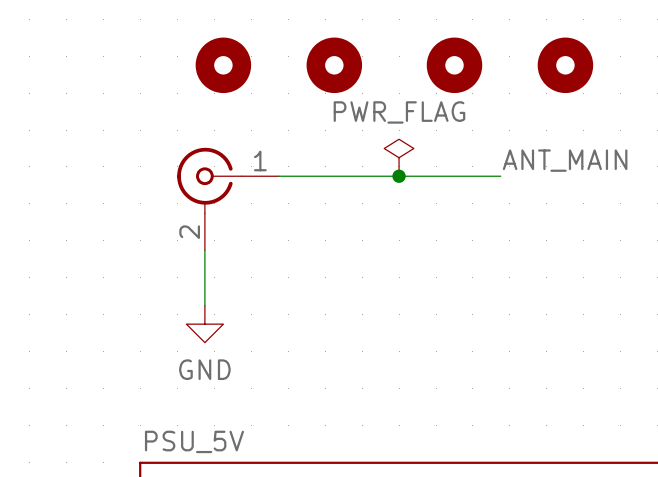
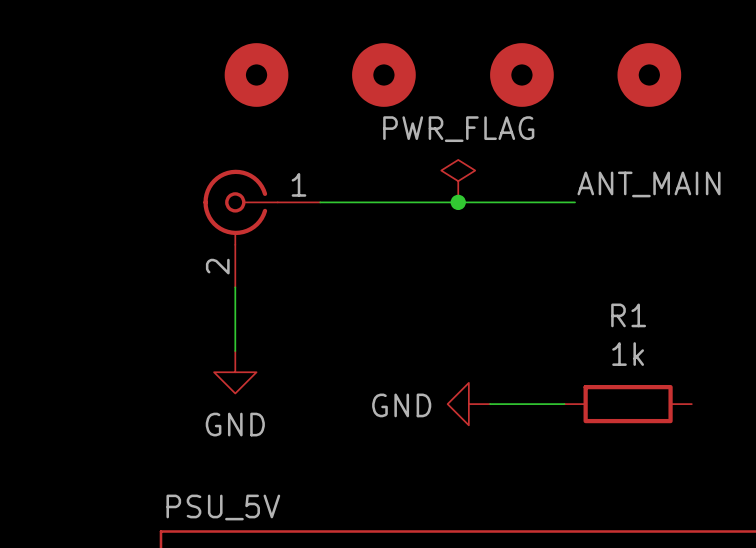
power symbol: none -> GND (468, 404)
wire: none -> (490, 404) (564, 404)
R1: none -> 1k (628, 404)

